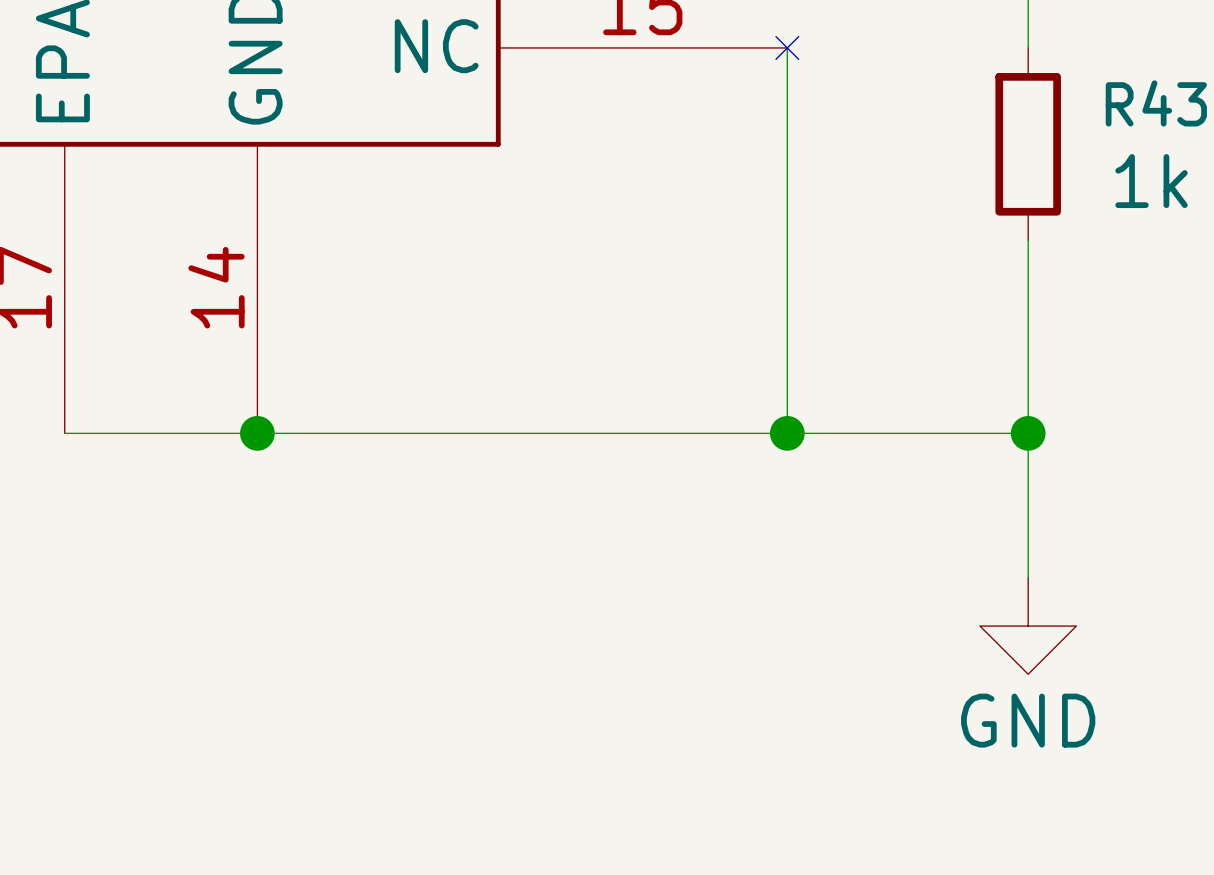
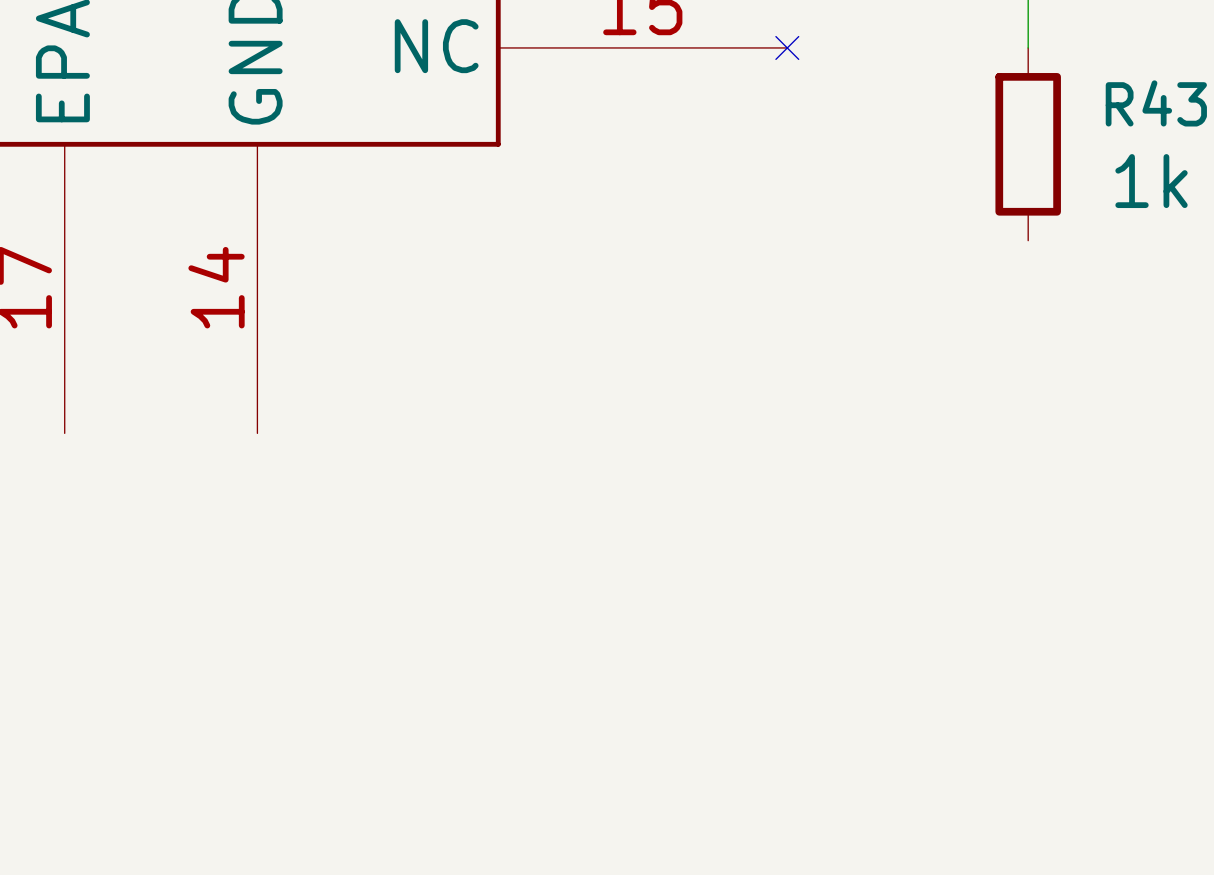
wire: (787, 47) (787, 433) -> none
wire: (1028, 240) (1028, 577) -> none
wire: (64, 433) (1028, 433) -> none
junction: (257, 433) -> none
junction: (787, 433) -> none
junction: (1028, 433) -> none
power symbol: GND (1028, 626) -> none

